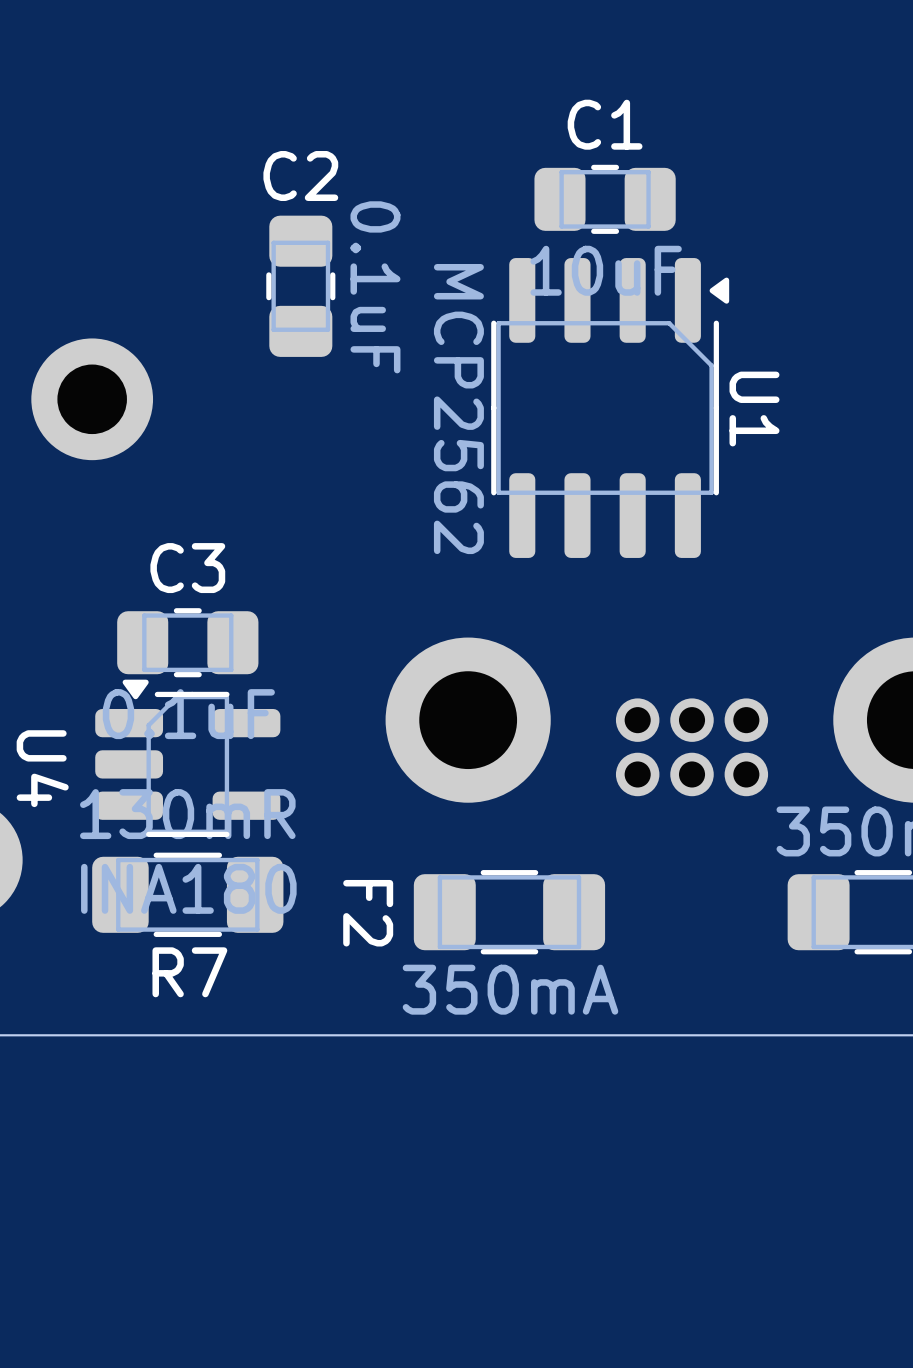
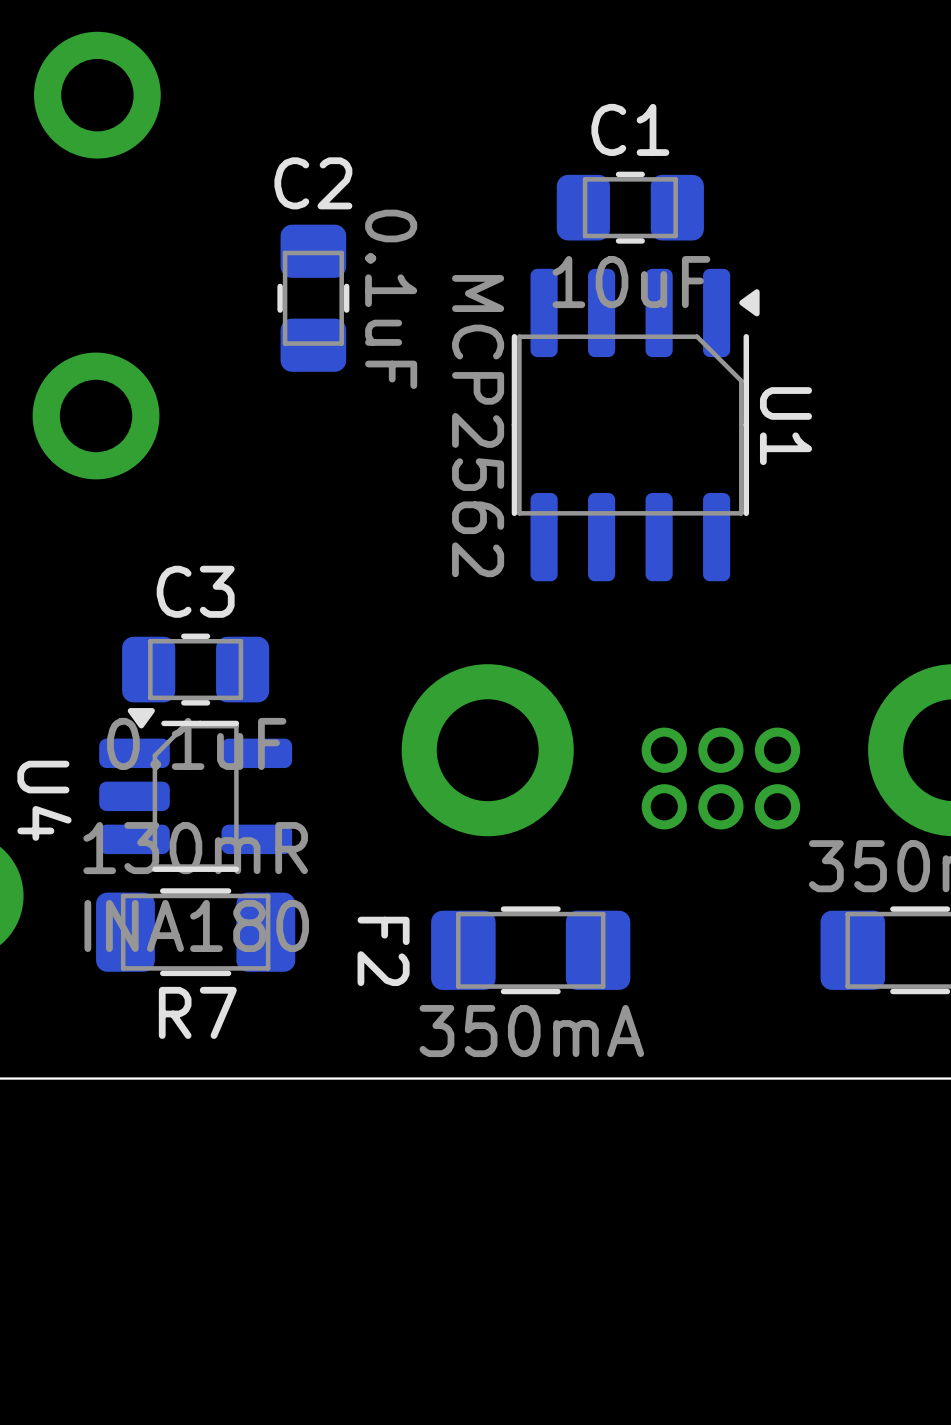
part: none -> (97, 95)

